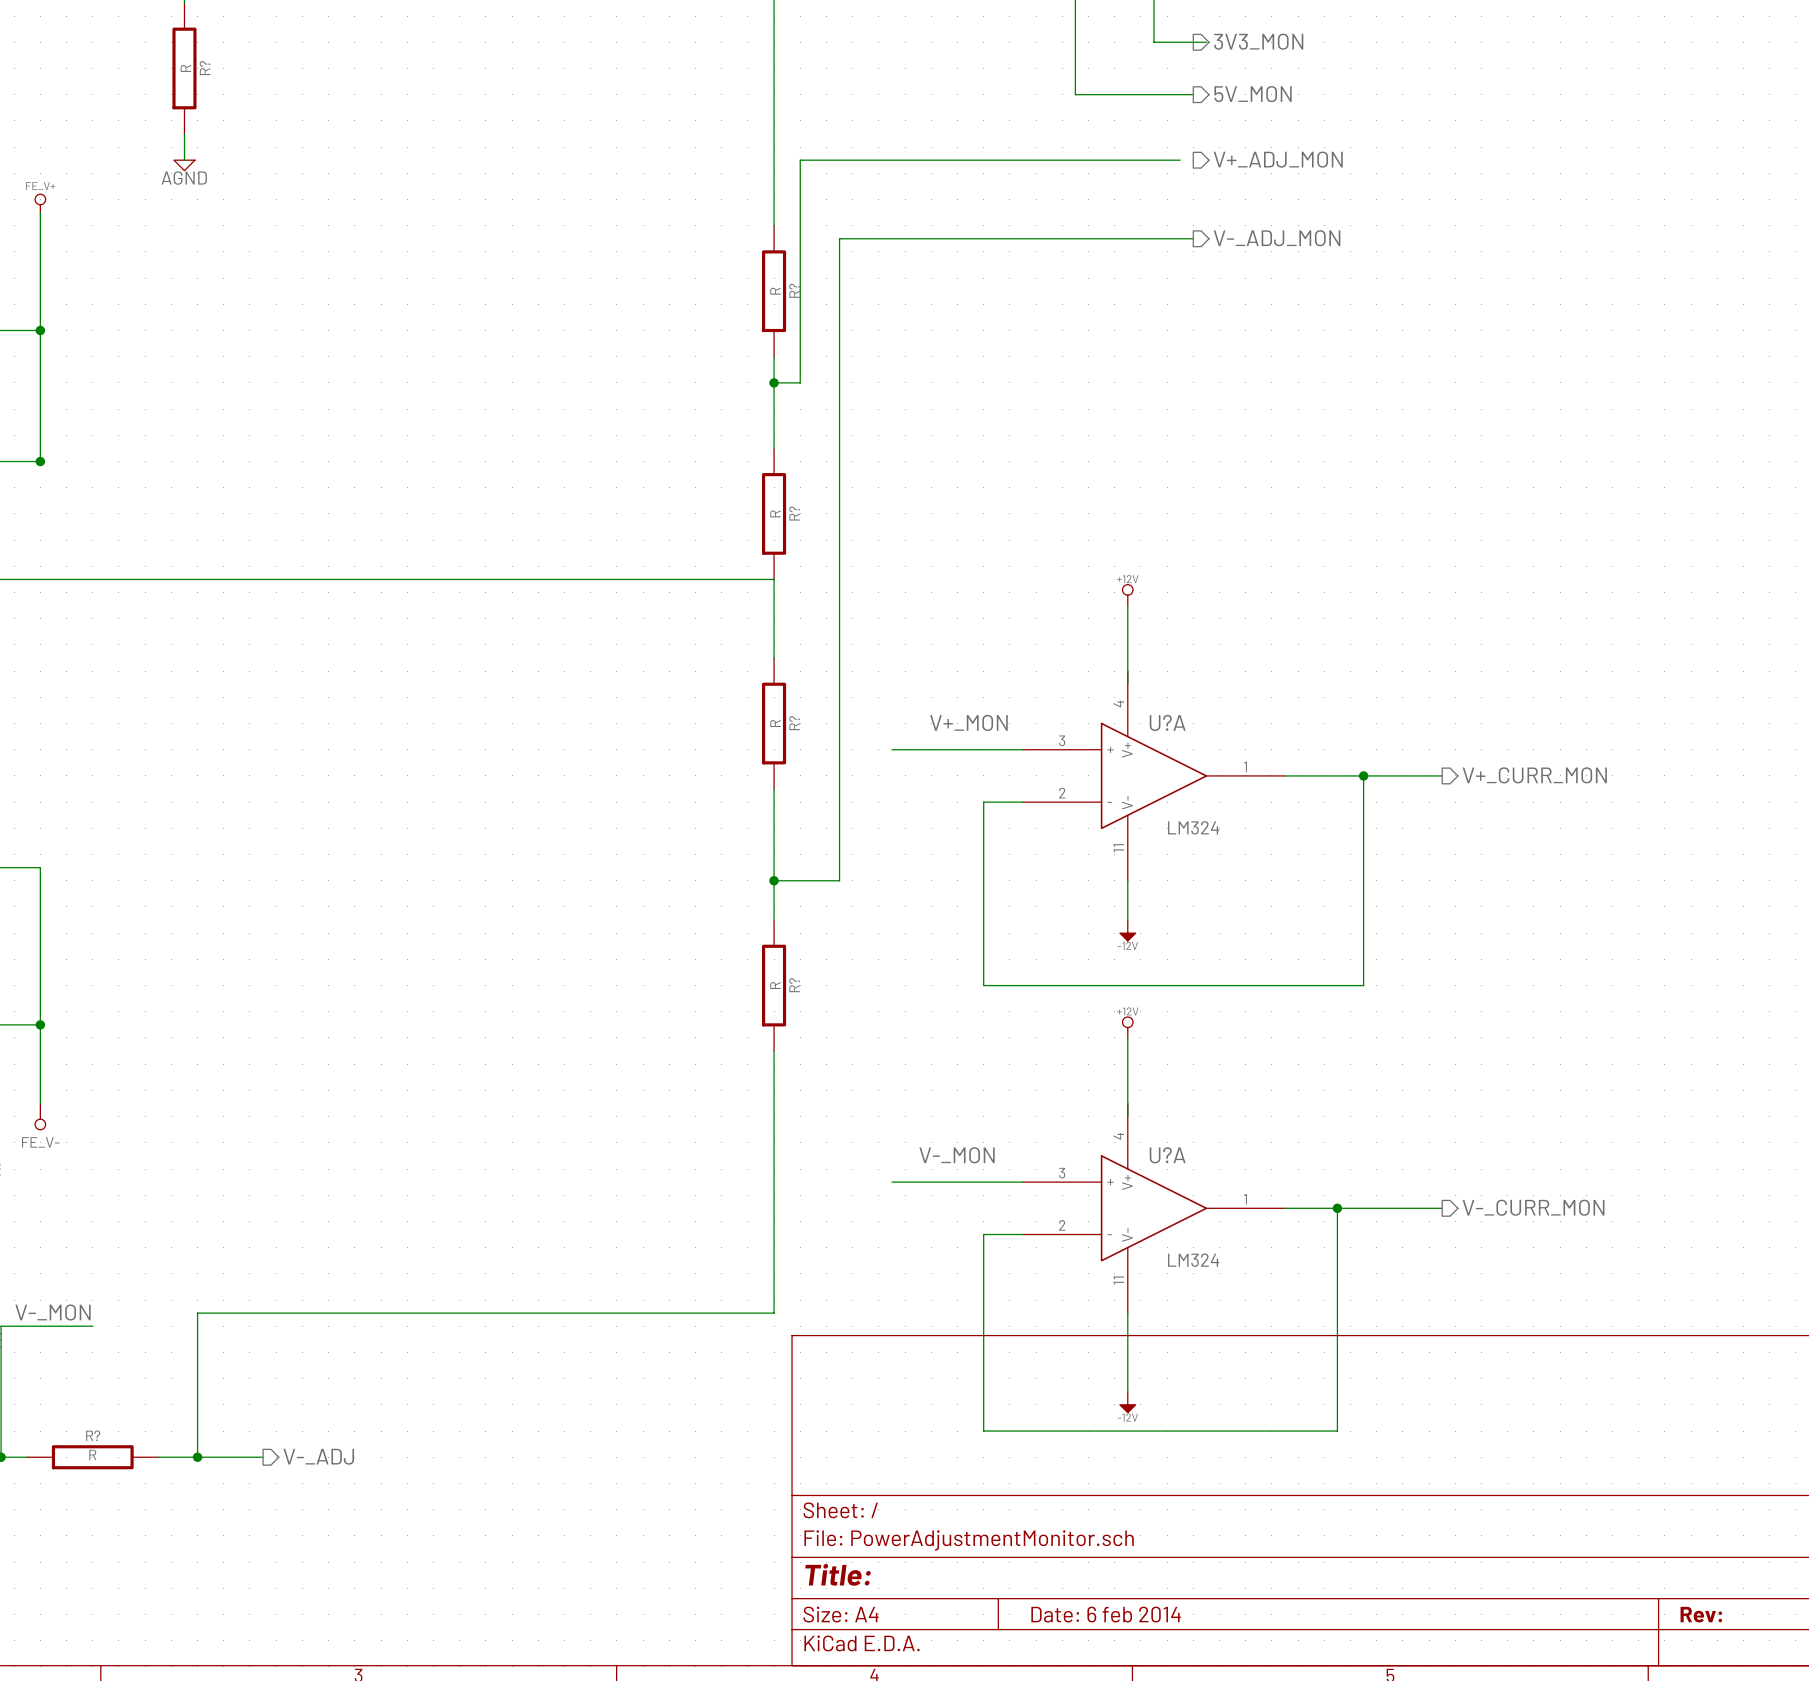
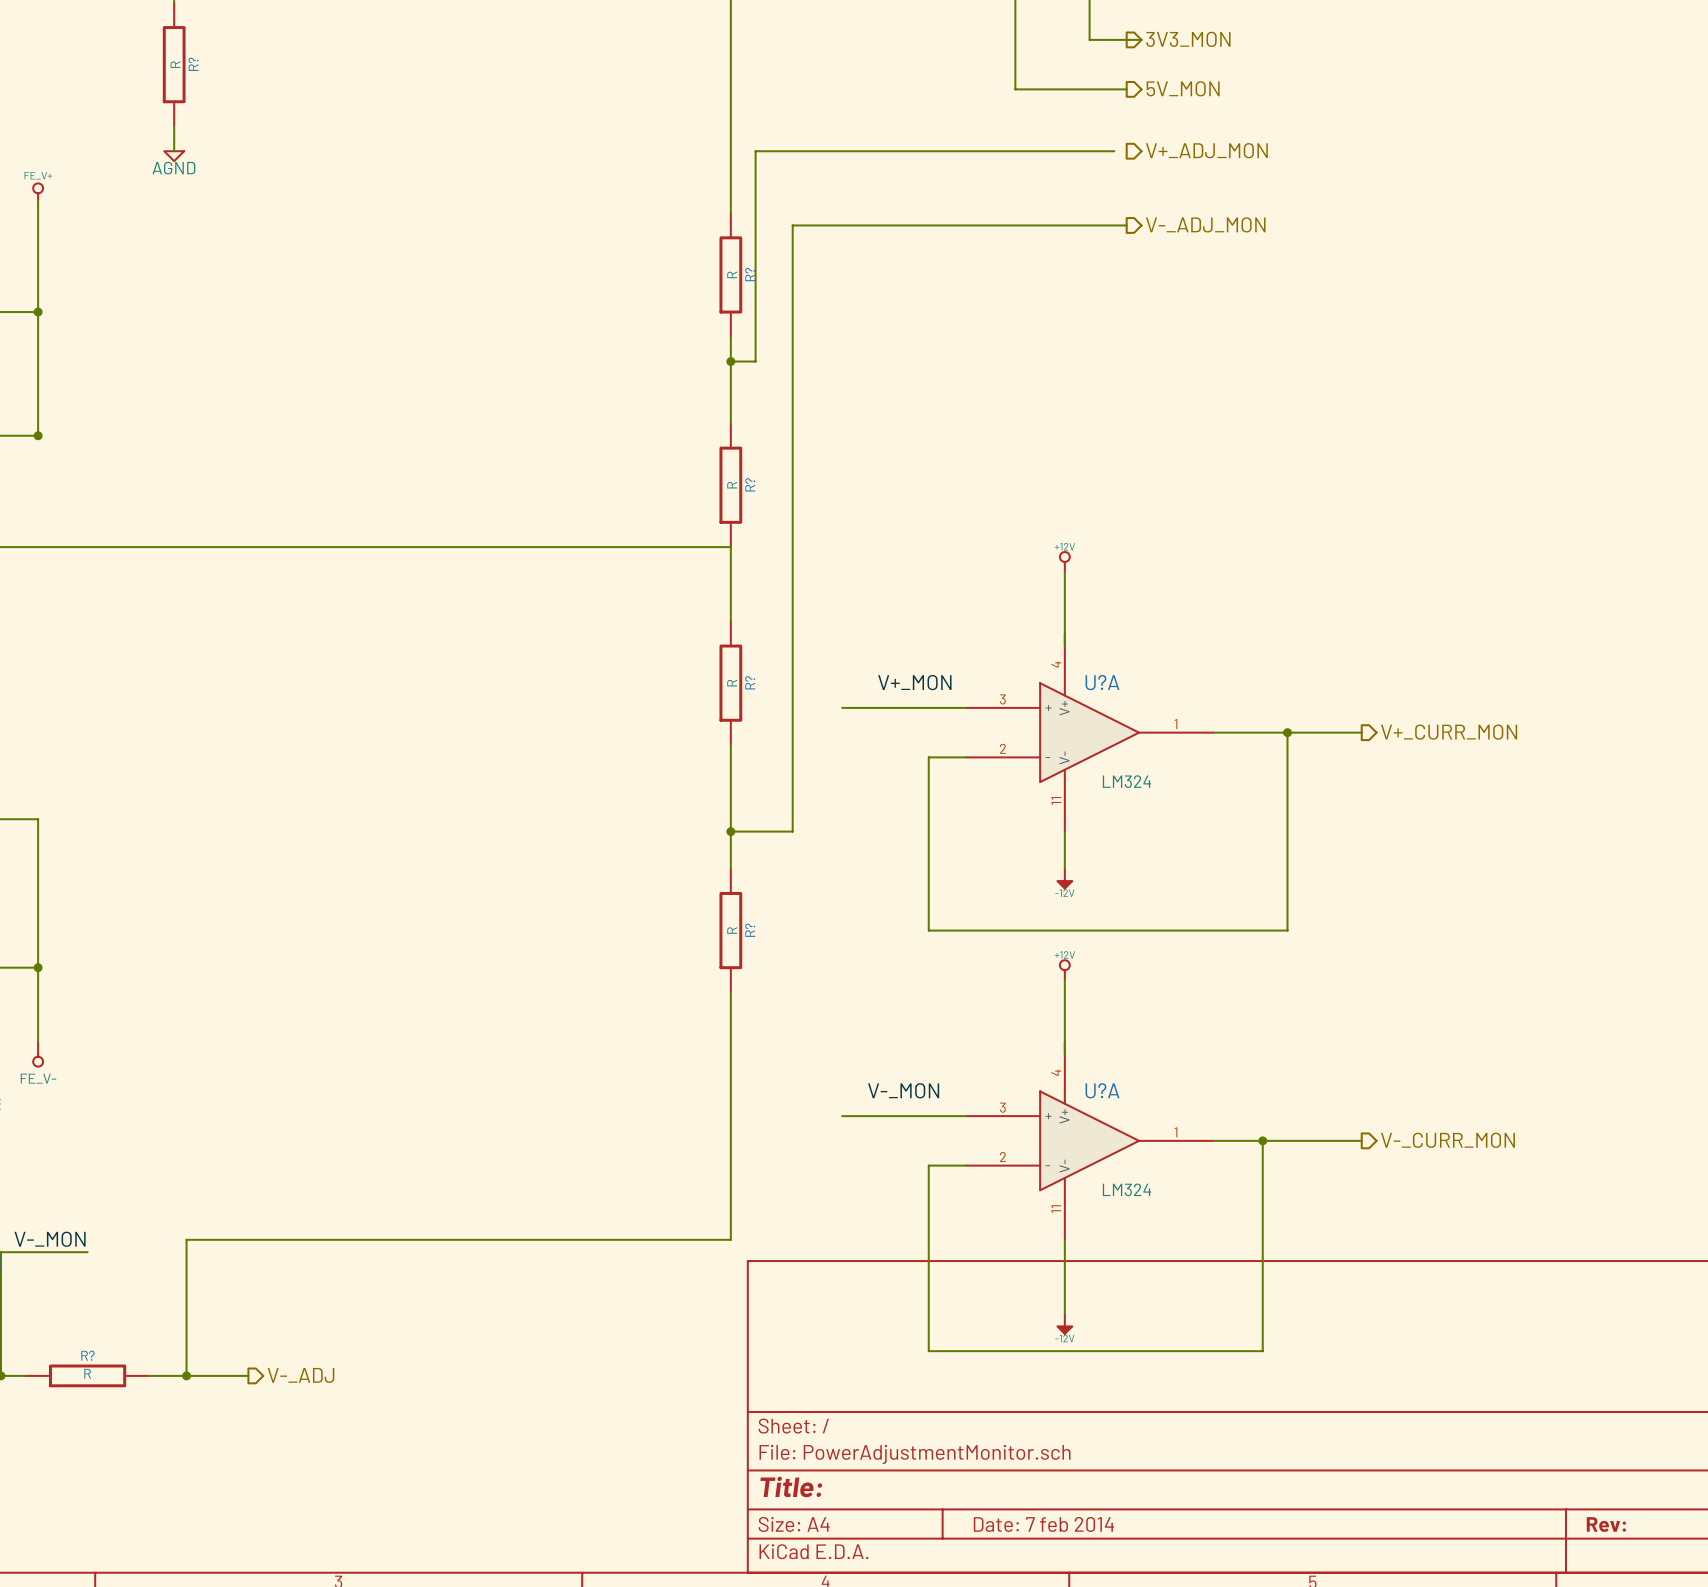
title block: Date: 6 feb 2014 (1106, 1614) -> Date: 7 feb 2014 (1043, 1524)

